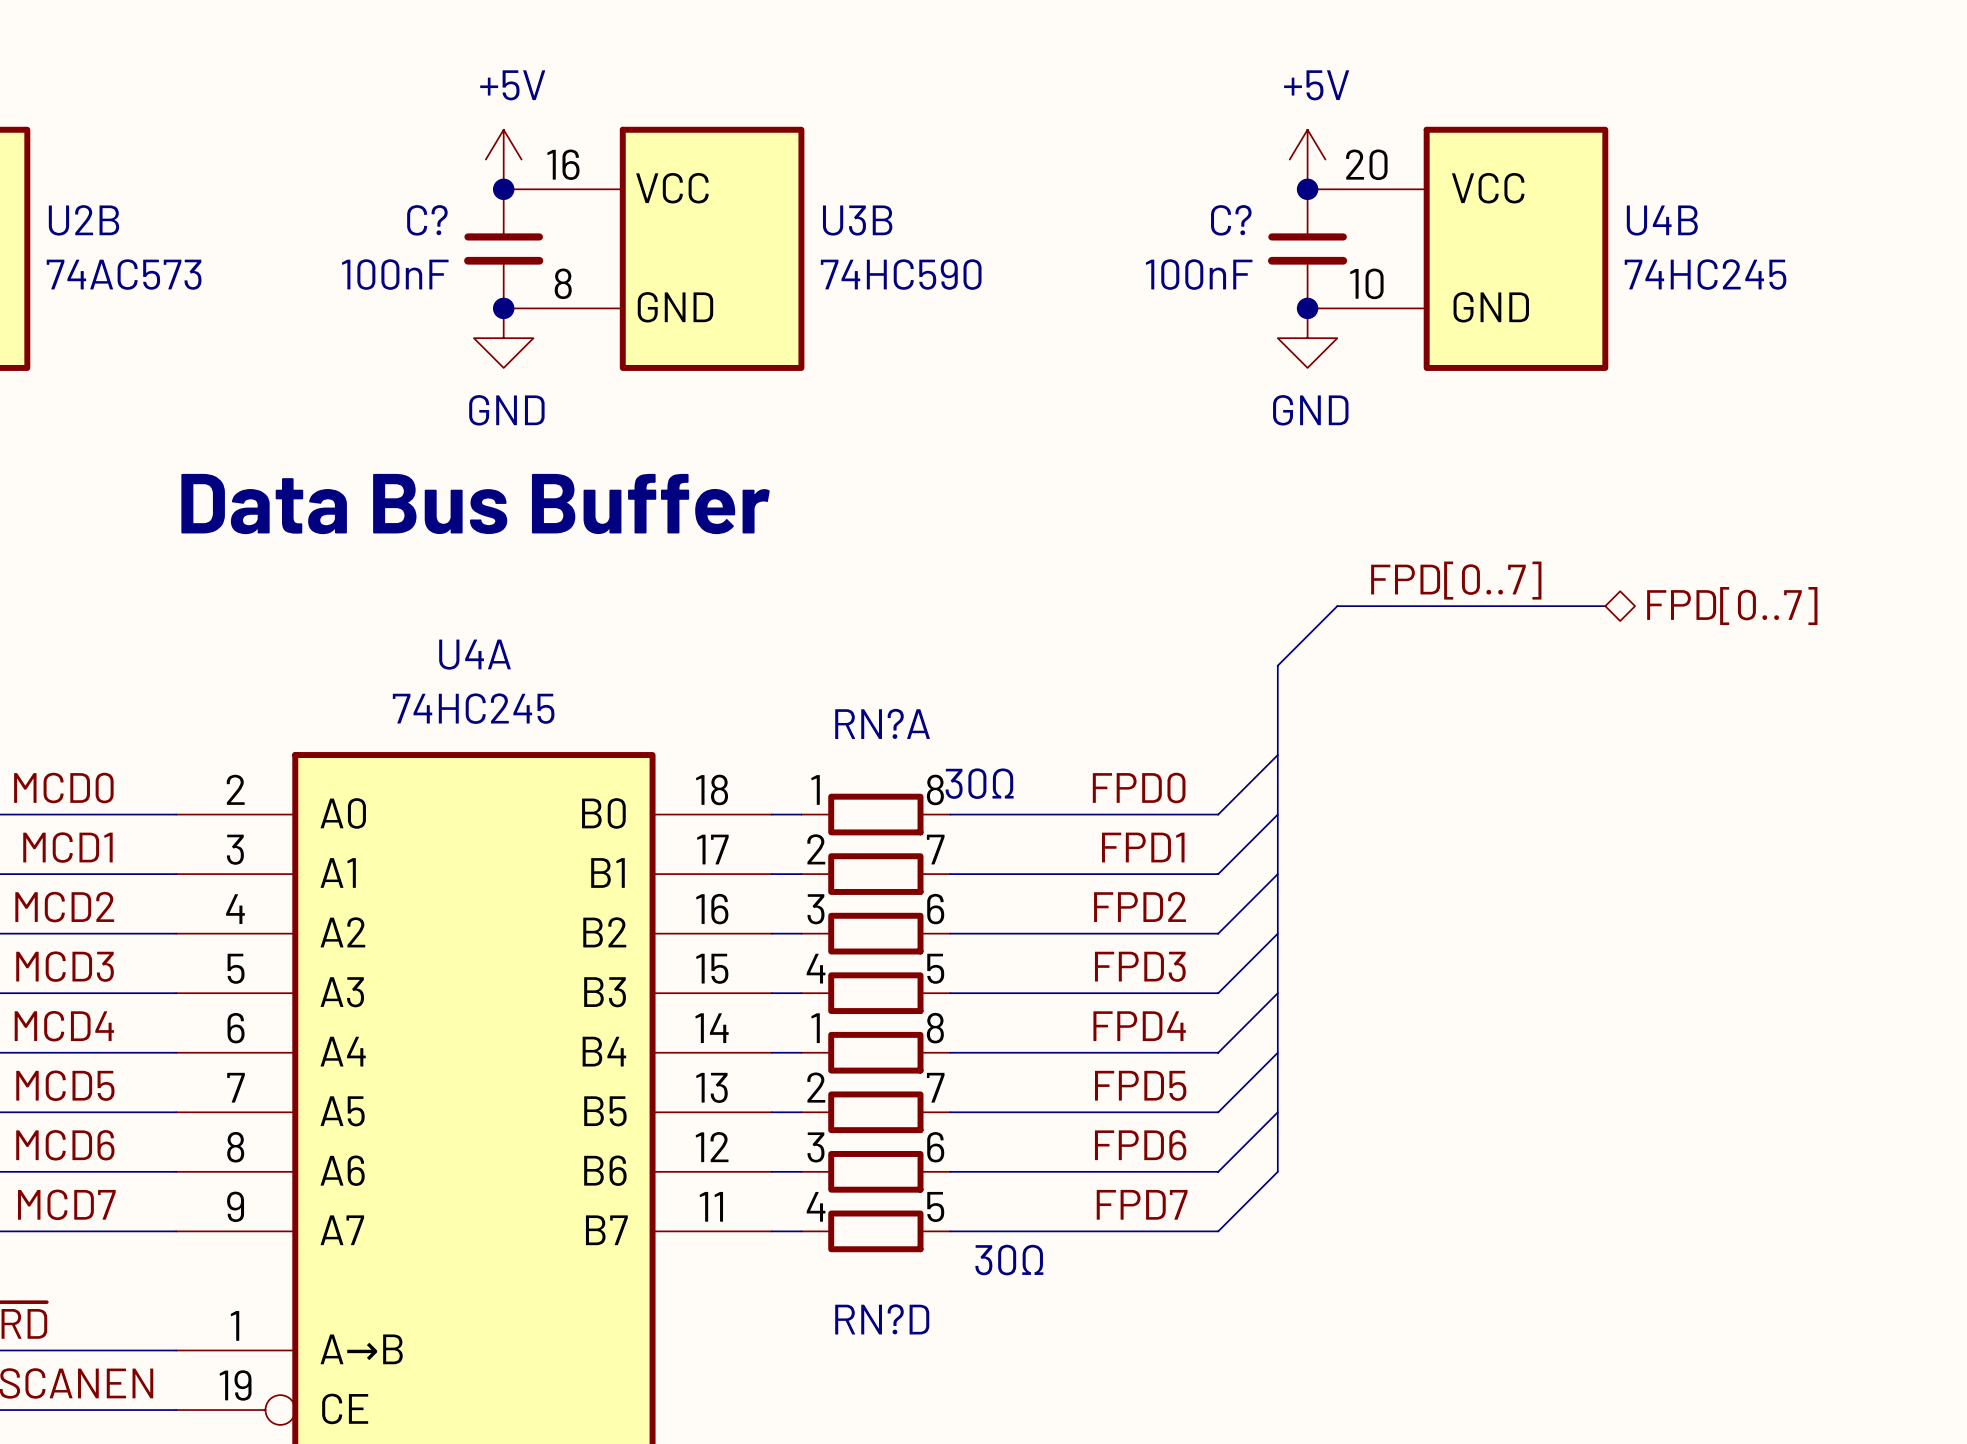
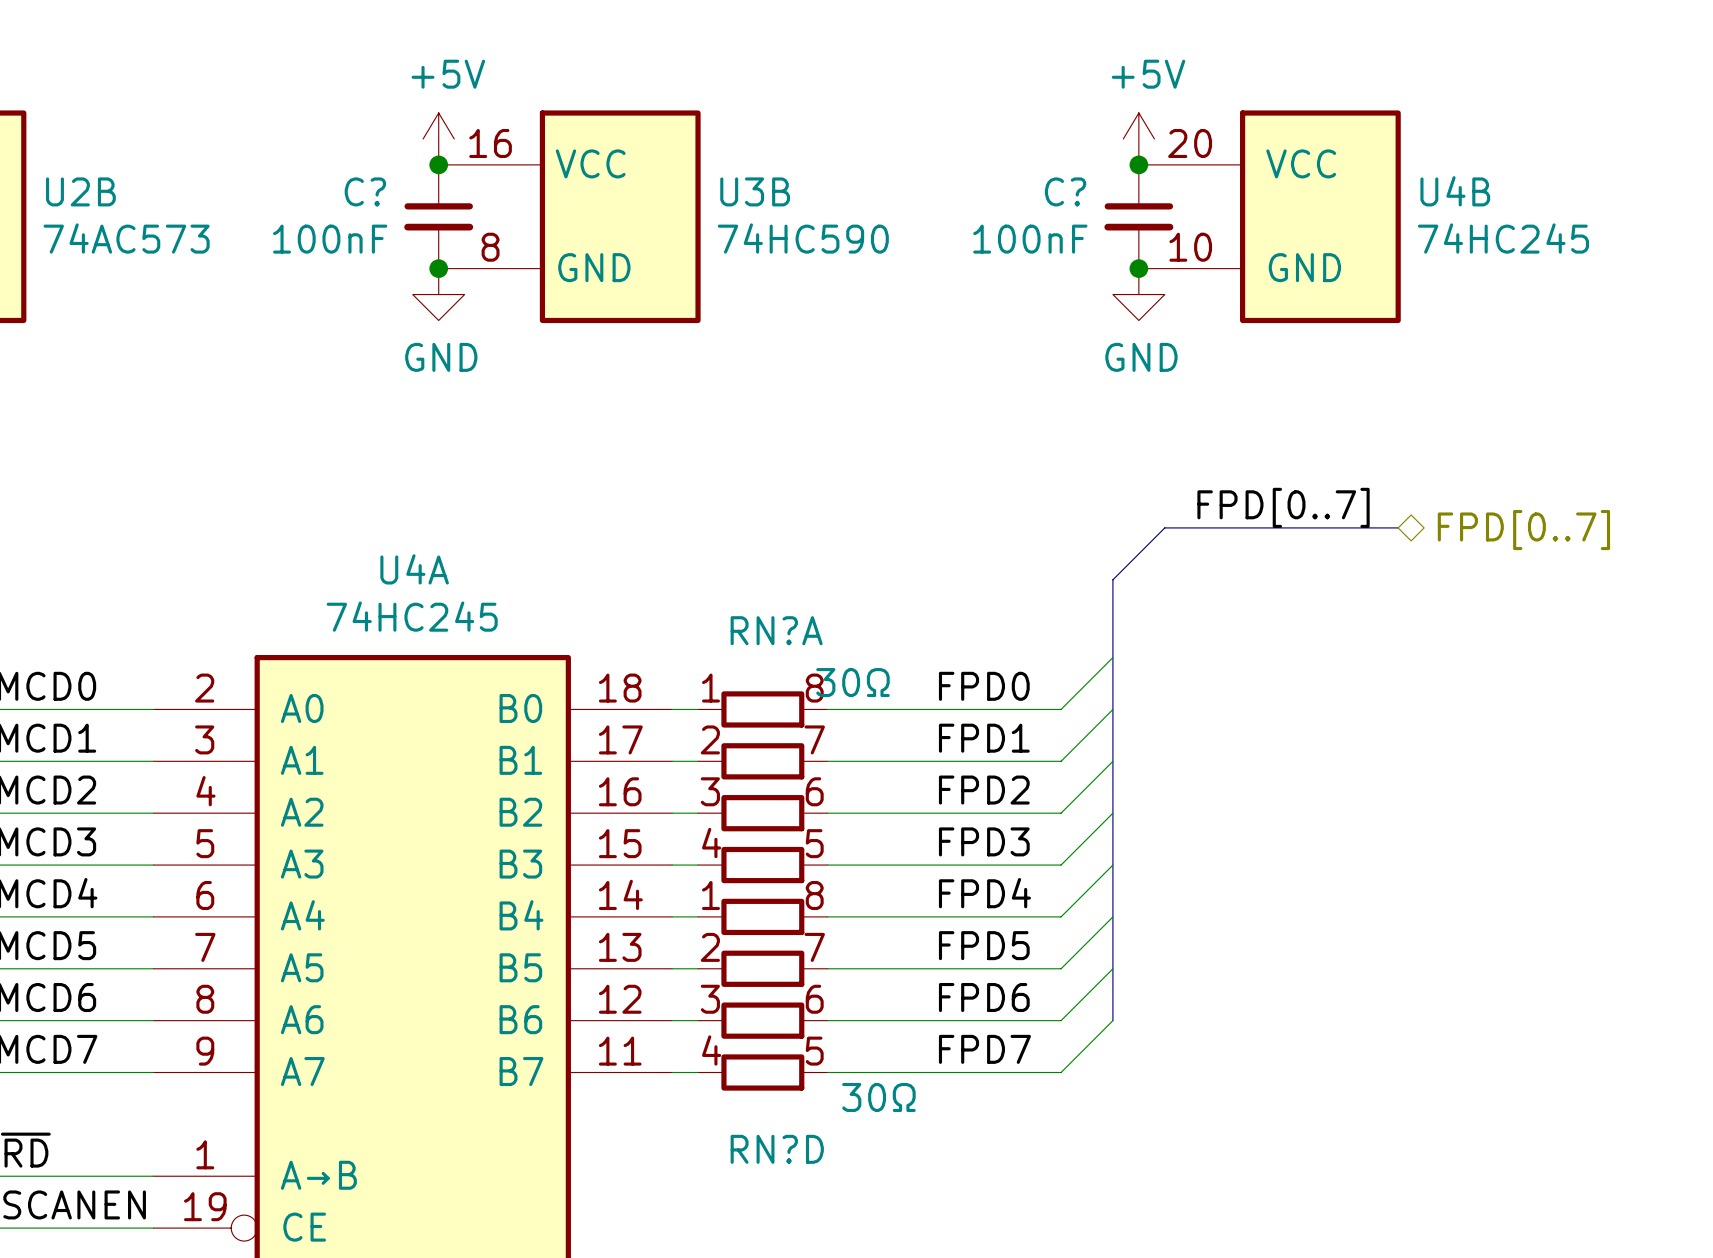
text: Data Bus Buffer (475, 503) -> none

